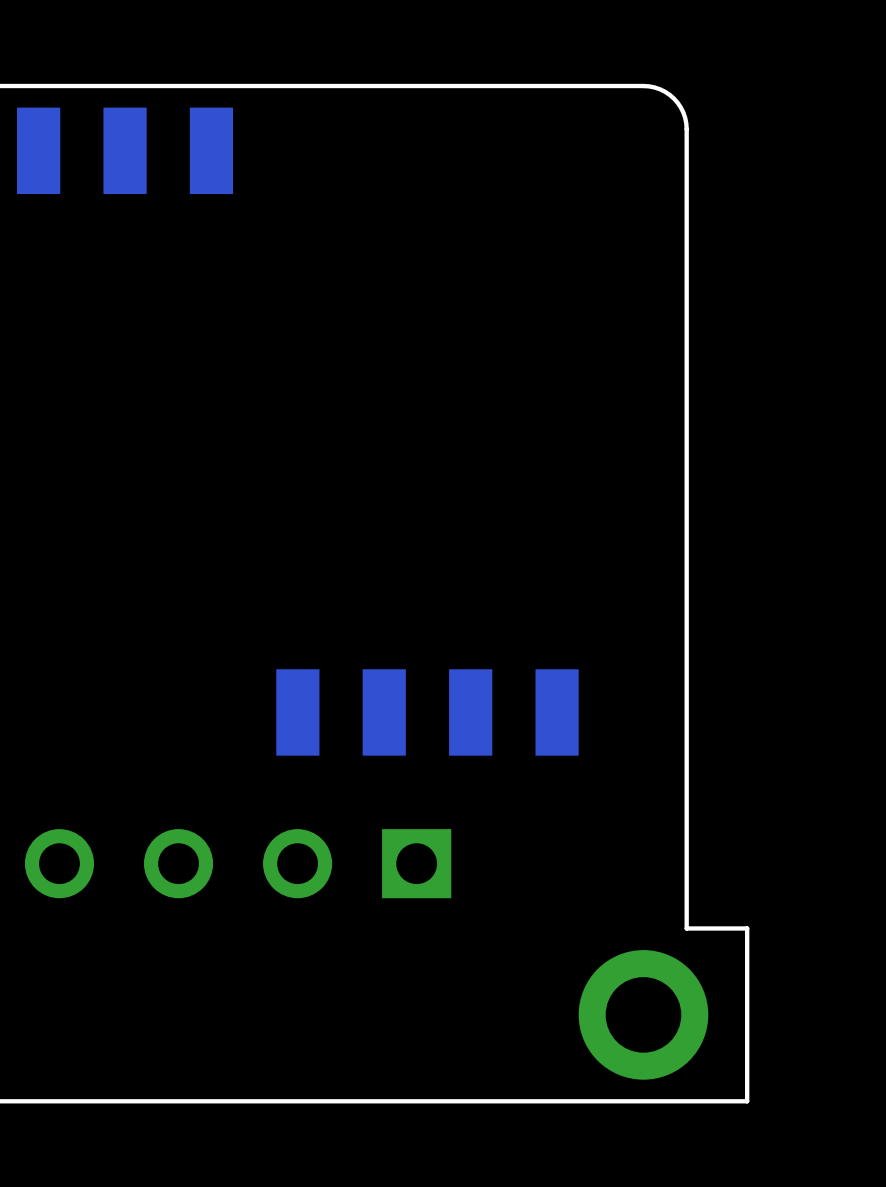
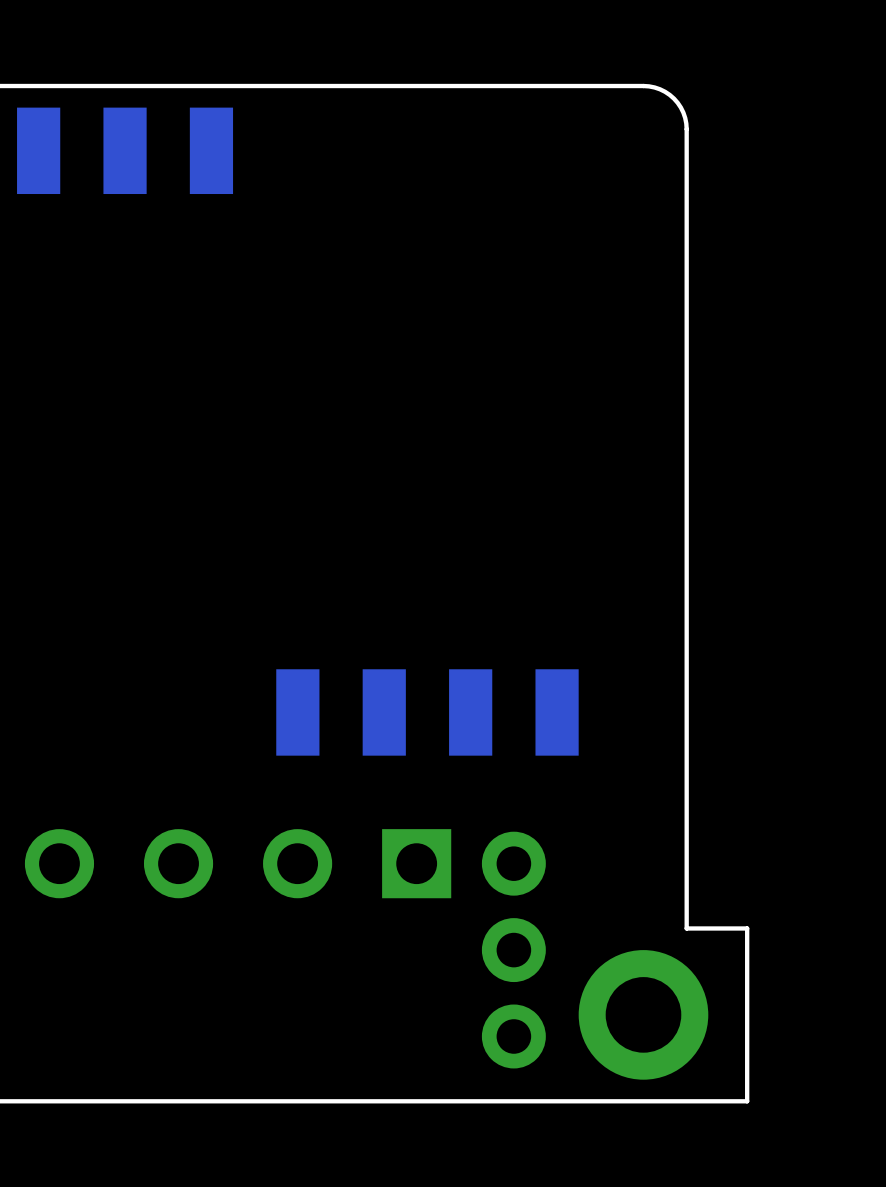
part: none -> (513, 950)

